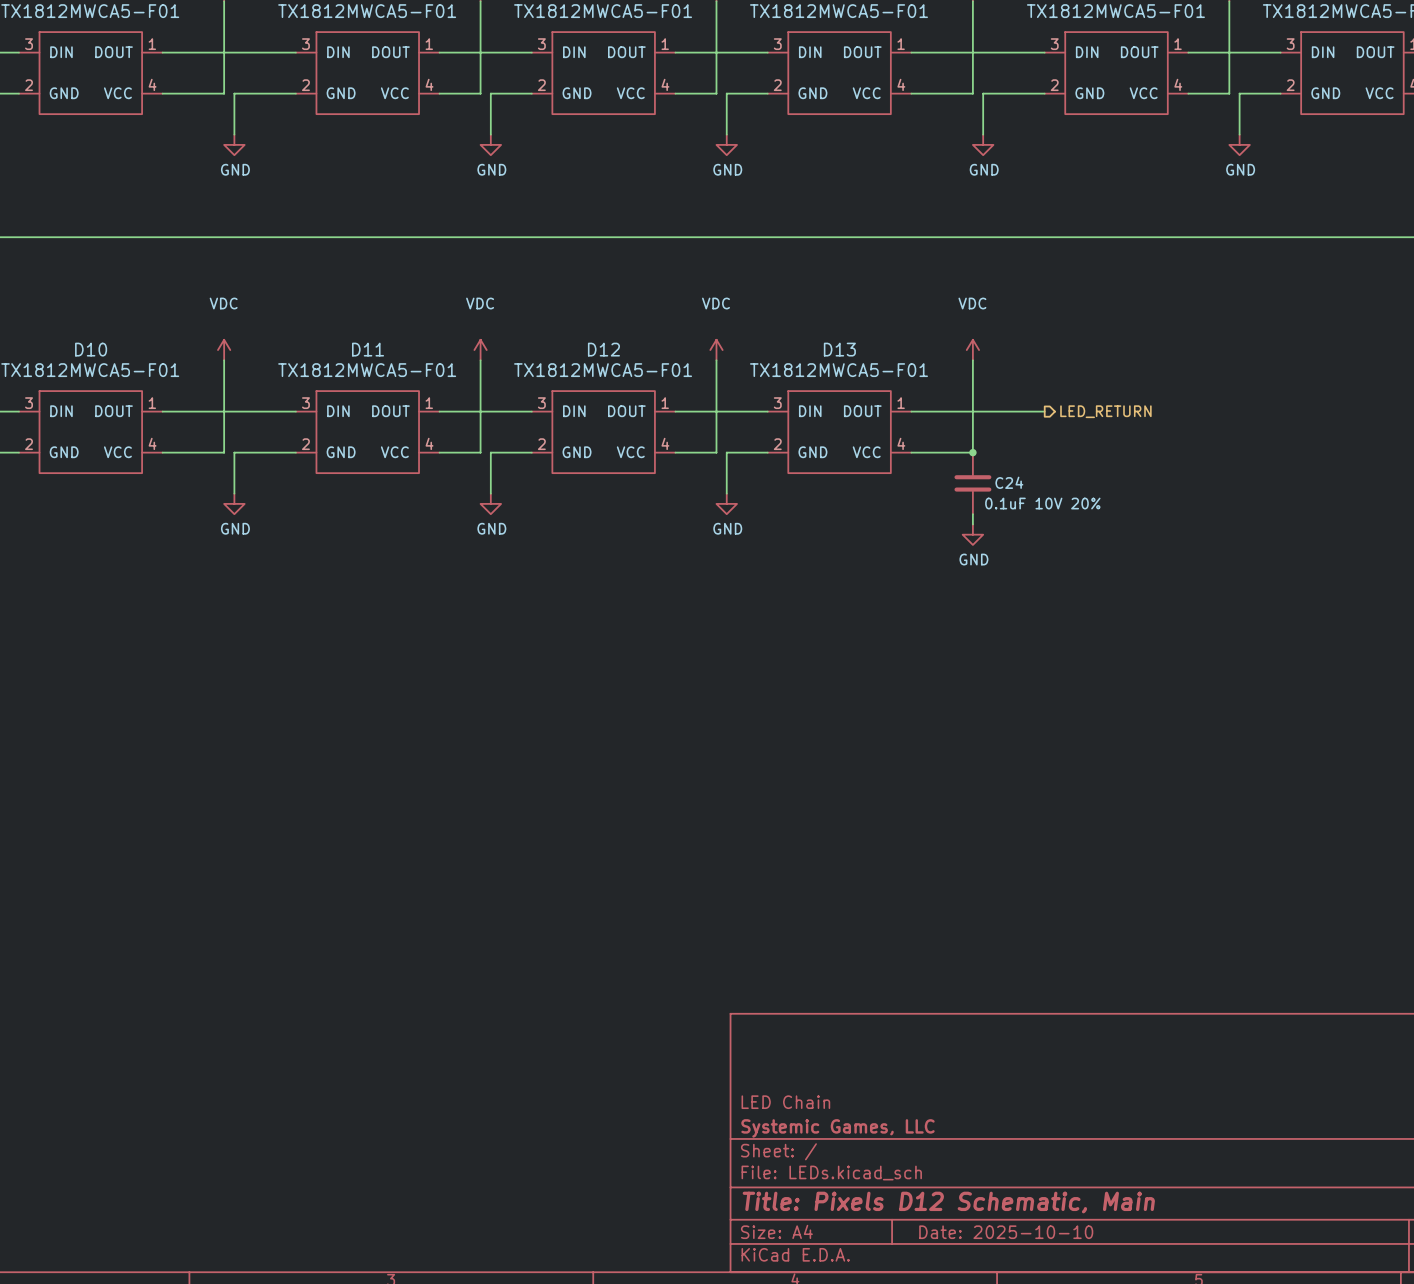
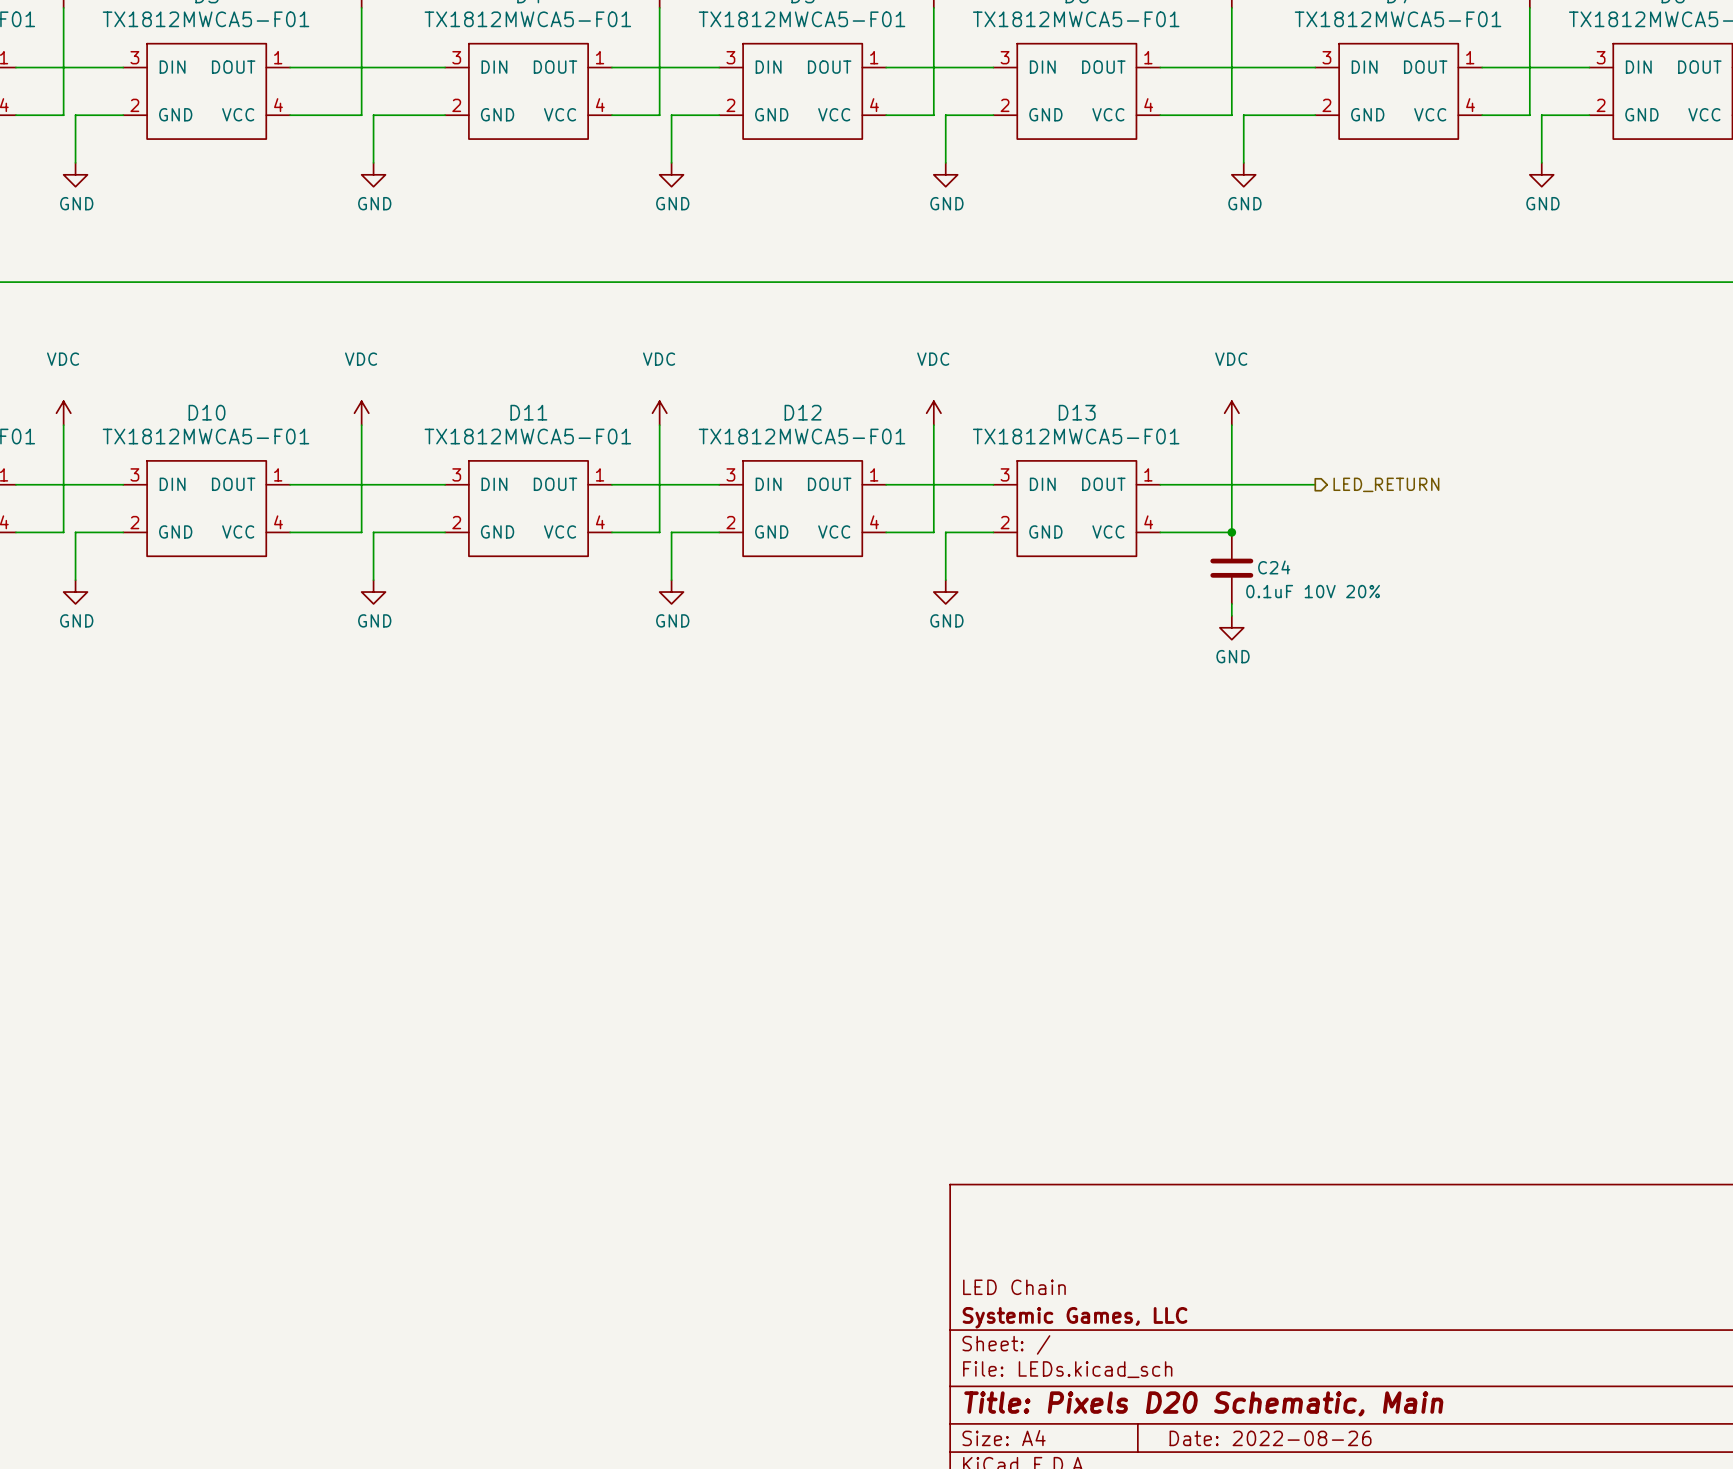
title block: Title: Pixels D12 Schematic, Main (948, 1202) -> Title: Pixels D20 Schematic, Main (1203, 1403)
title block: Date: 2025-10-10 (1006, 1232) -> Date: 2022-08-26 (1270, 1438)

